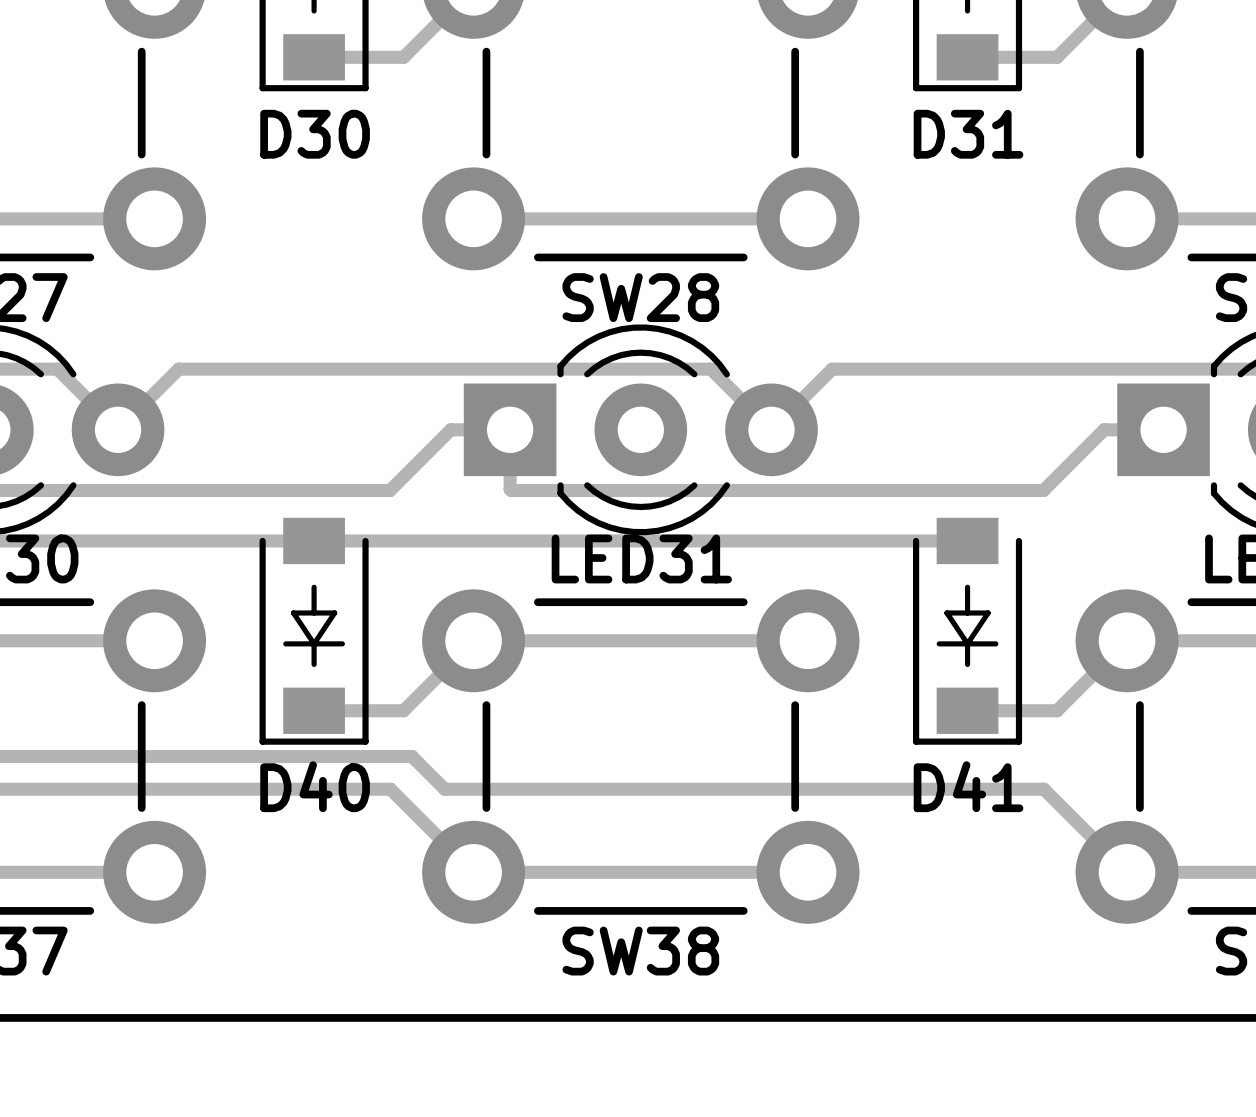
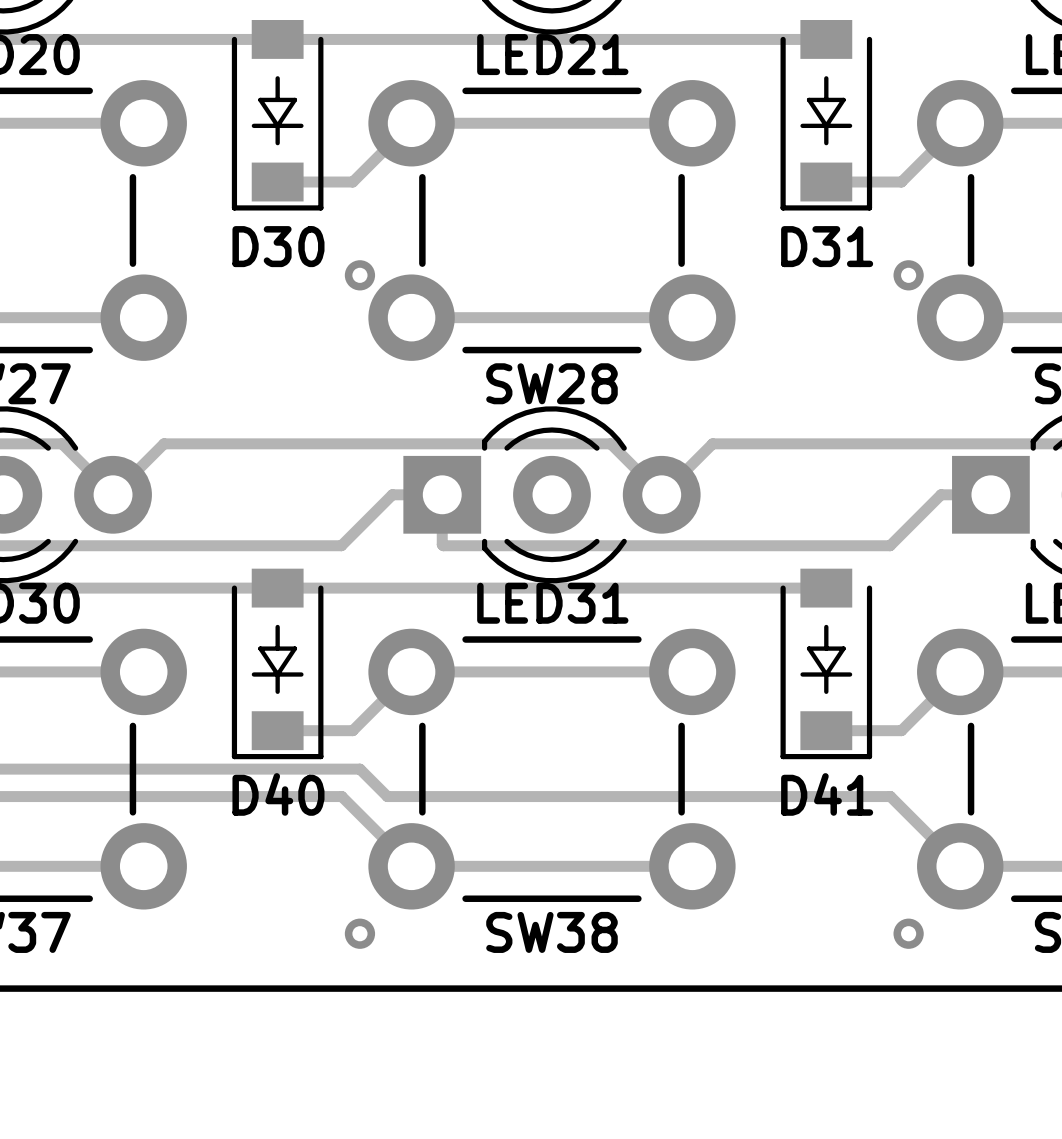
part: none -> (359, 275)
part: none -> (908, 275)
part: none -> (359, 933)
part: none -> (908, 933)

